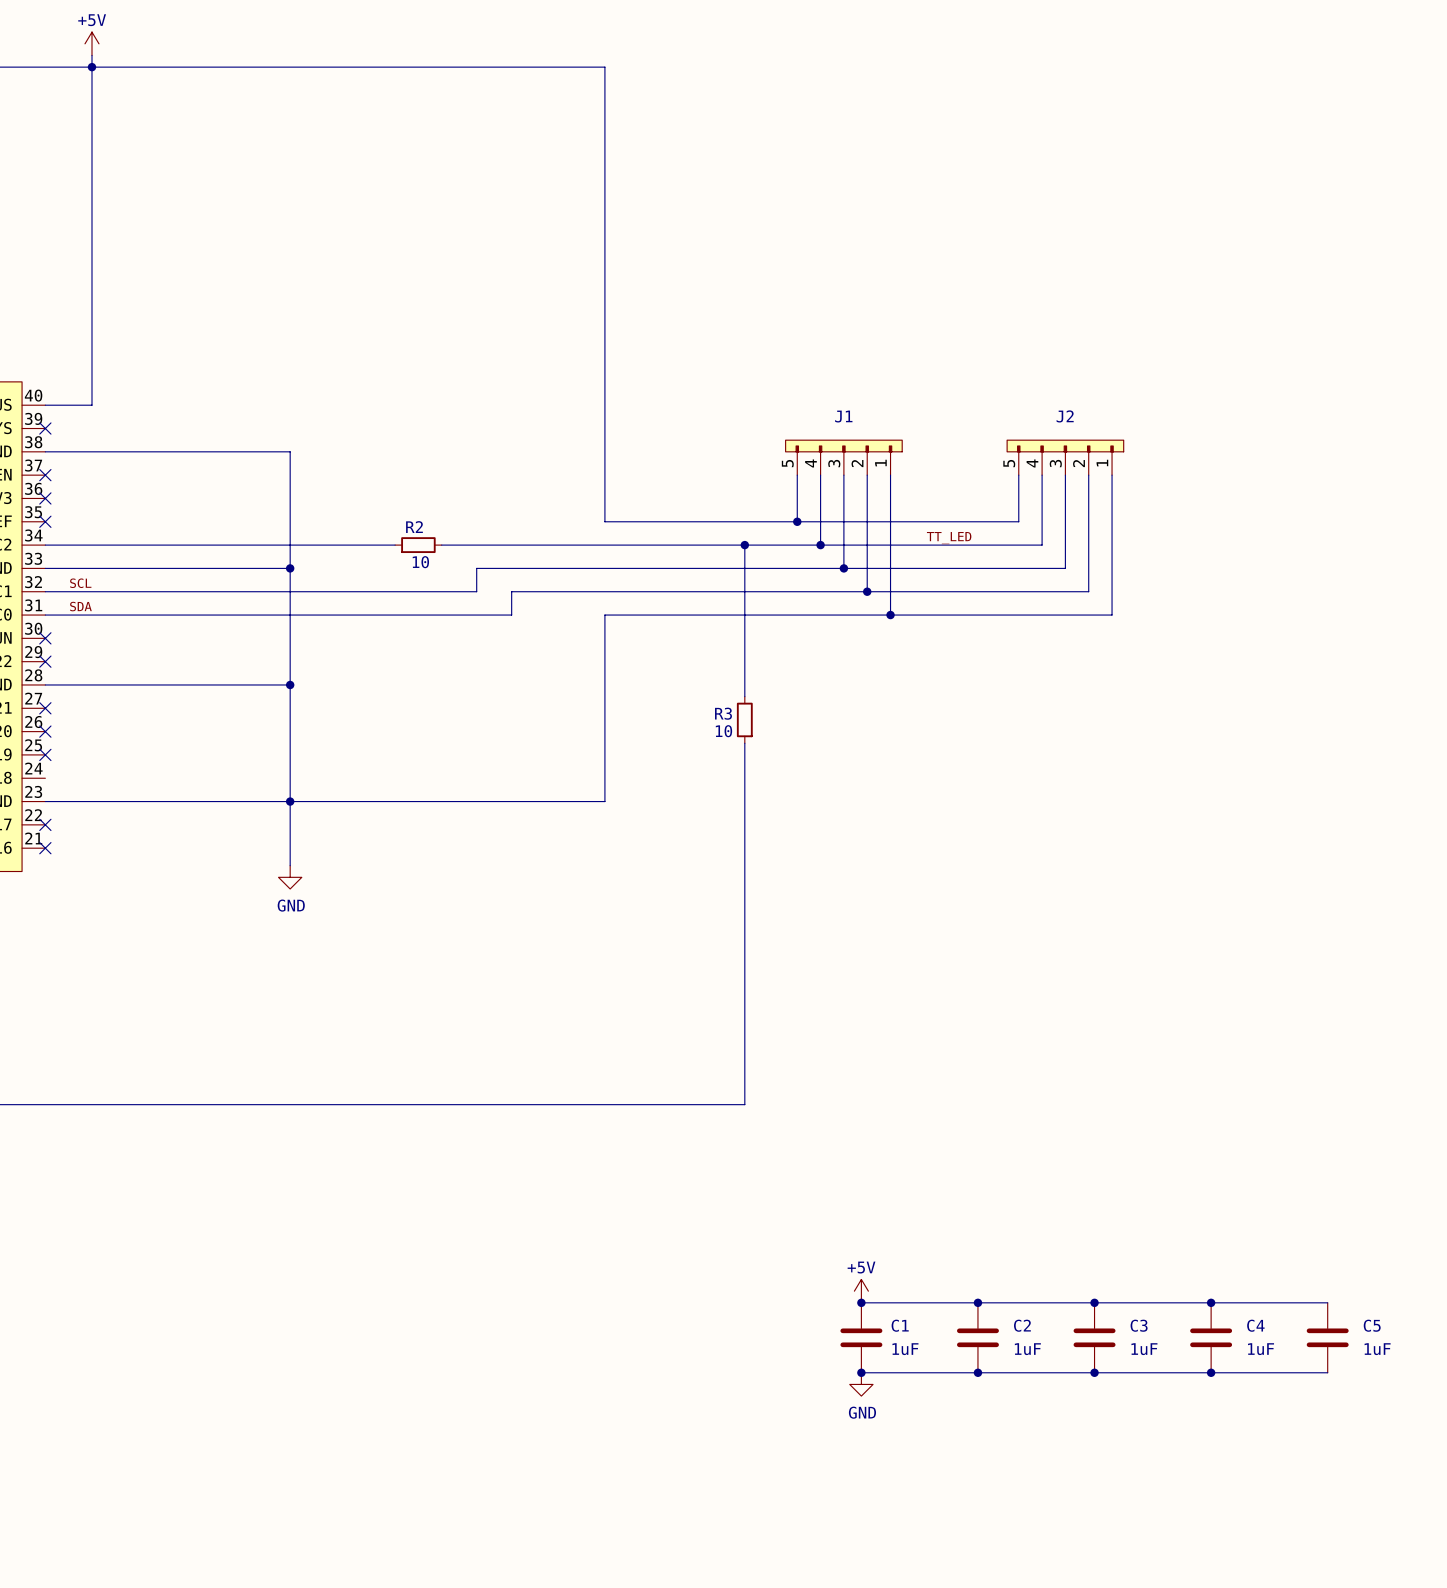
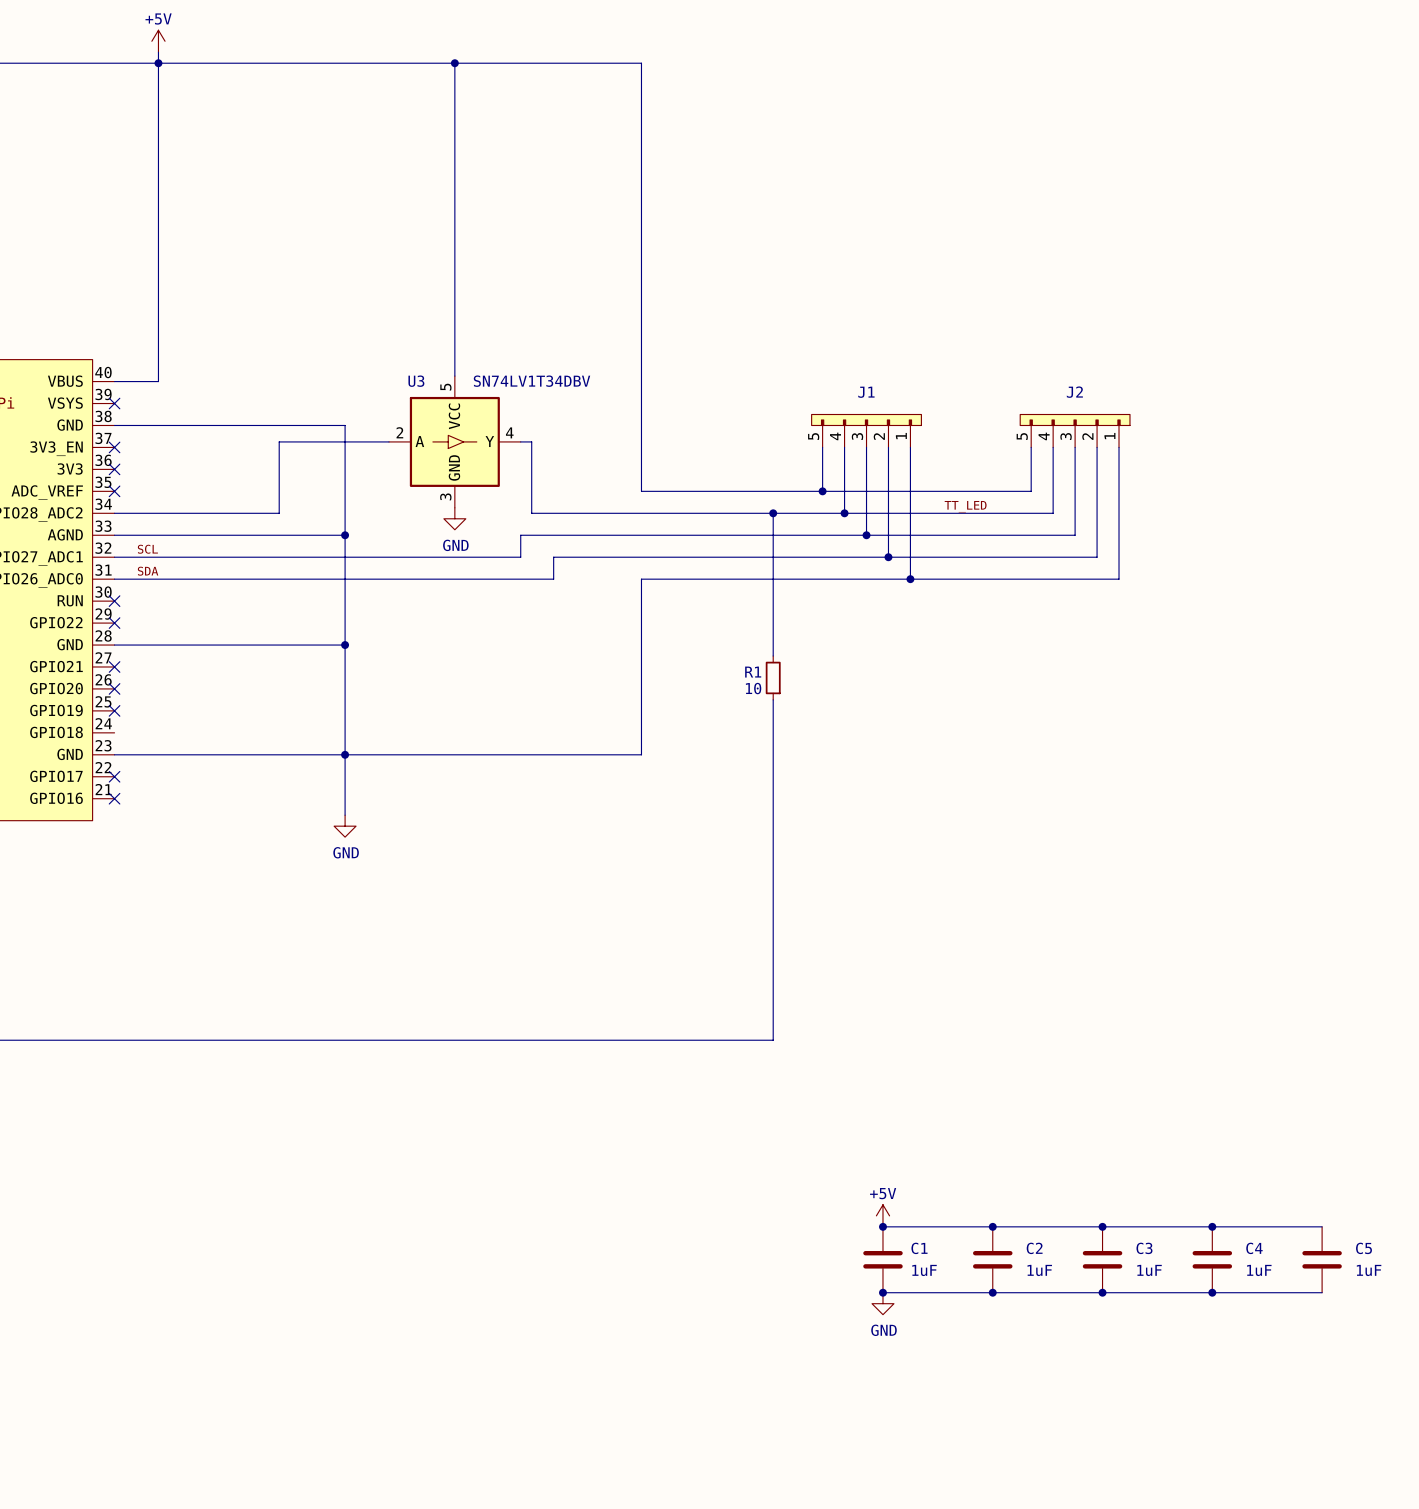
wire: none -> (454, 63) (454, 376)
junction: none -> (454, 63)
U3: none -> SN74LV1T34DBV (454, 441)
wire: (220, 545) (395, 545) -> (279, 513) (279, 441) (388, 441)
R2: 10 (418, 545) -> none
wire: (441, 545) (488, 545) -> (520, 441) (531, 441) (531, 513)
power symbol: none -> GND (454, 518)
R3 name: R3 (723, 713) -> R1 (753, 672)

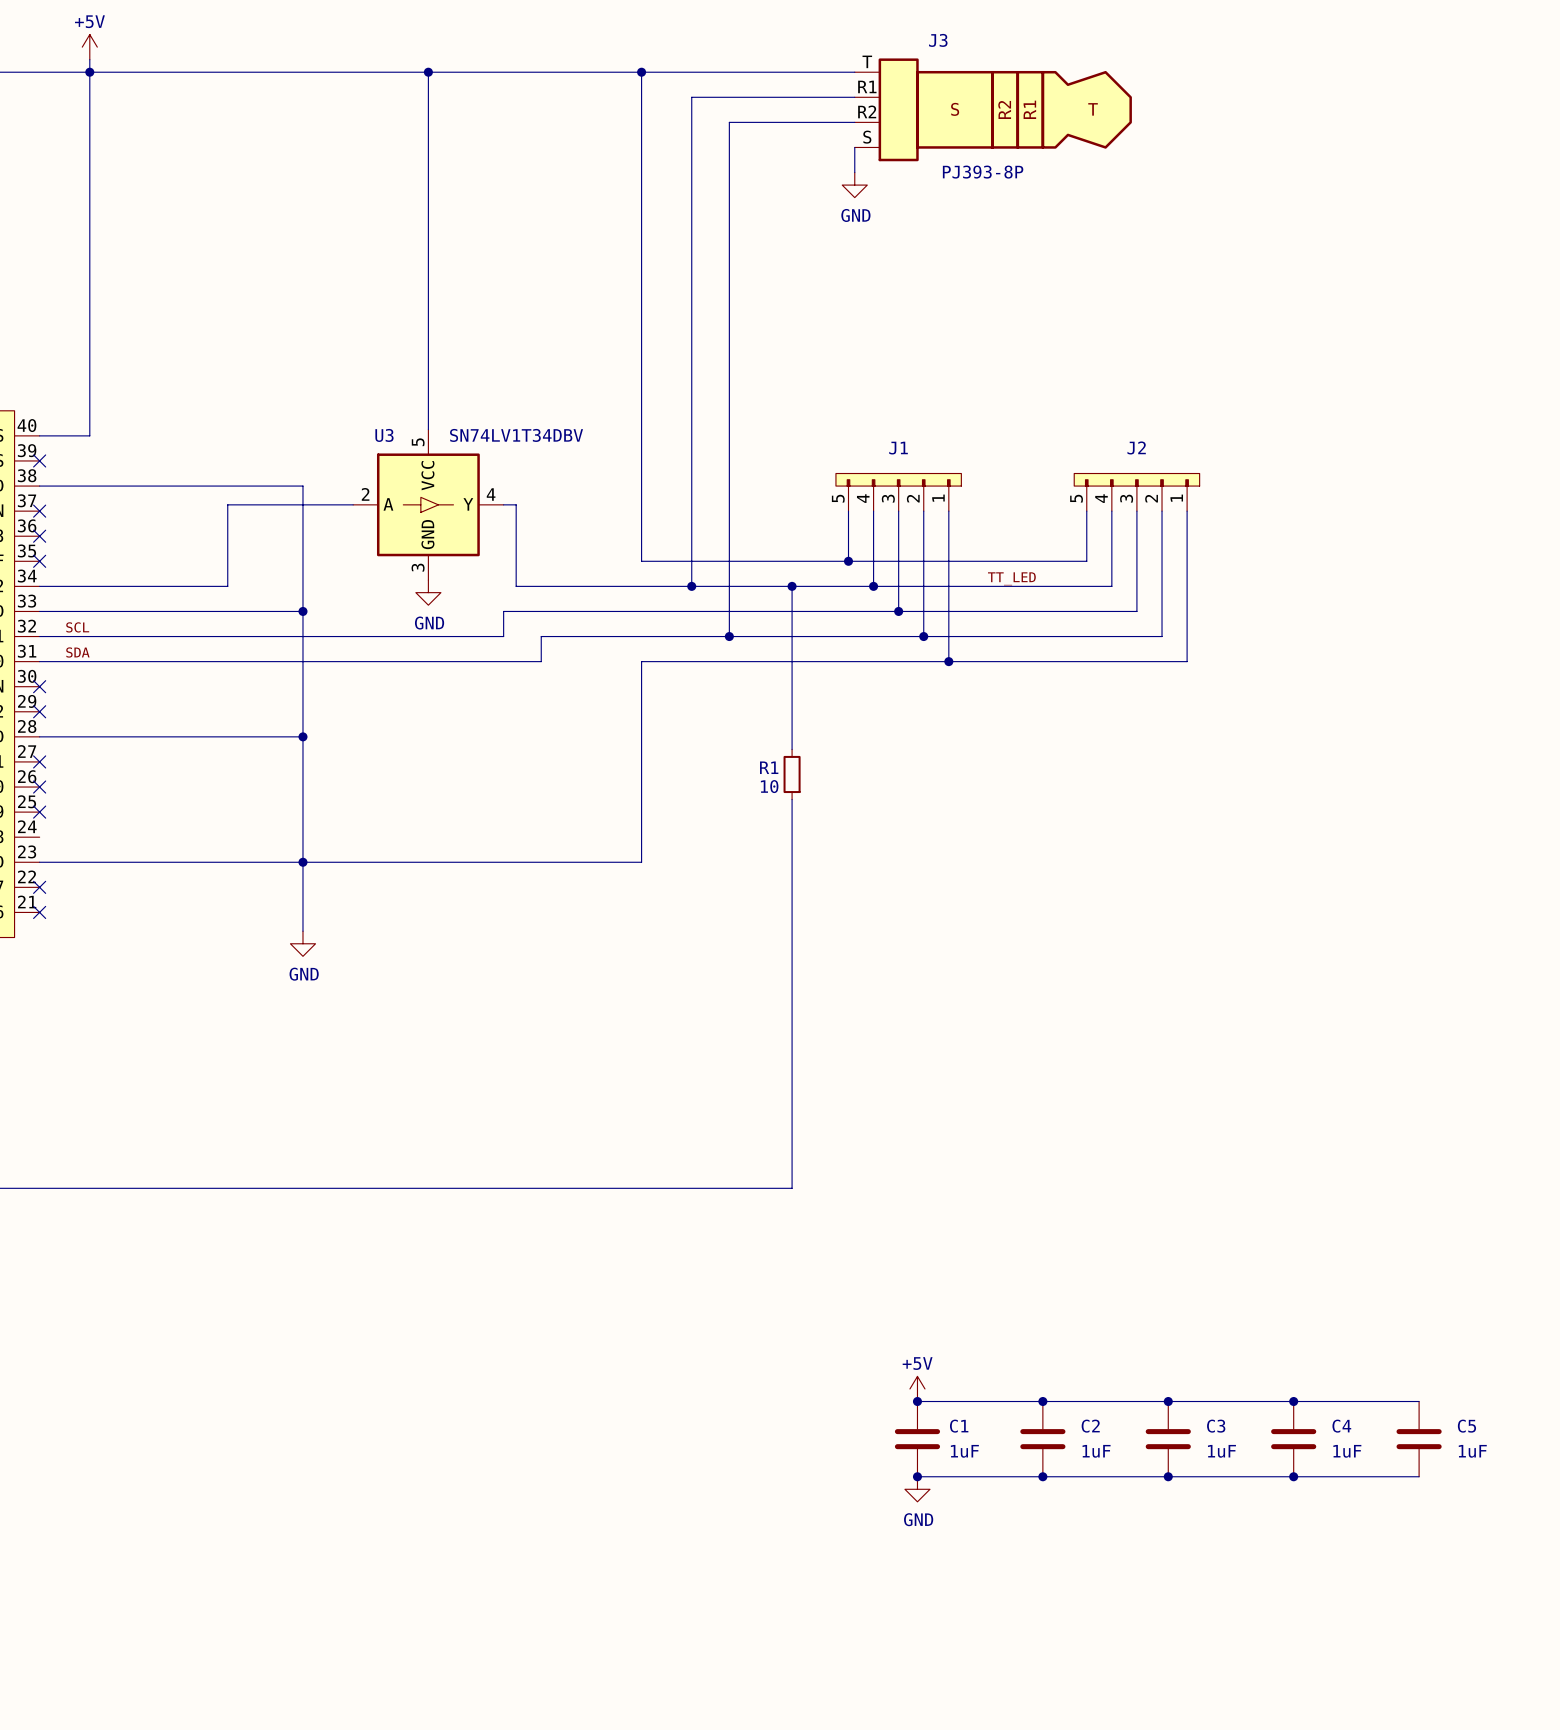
wire: none -> (641, 72) (854, 72)
junction: none -> (641, 72)
wire: none -> (854, 97) (691, 97) (691, 586)
J3: none -> PJ393-8P (993, 109)
wire: none -> (854, 122) (729, 122) (729, 636)
wire: none -> (854, 147) (854, 172)
power symbol: none -> GND (854, 185)
junction: none -> (691, 586)
junction: none -> (729, 636)

